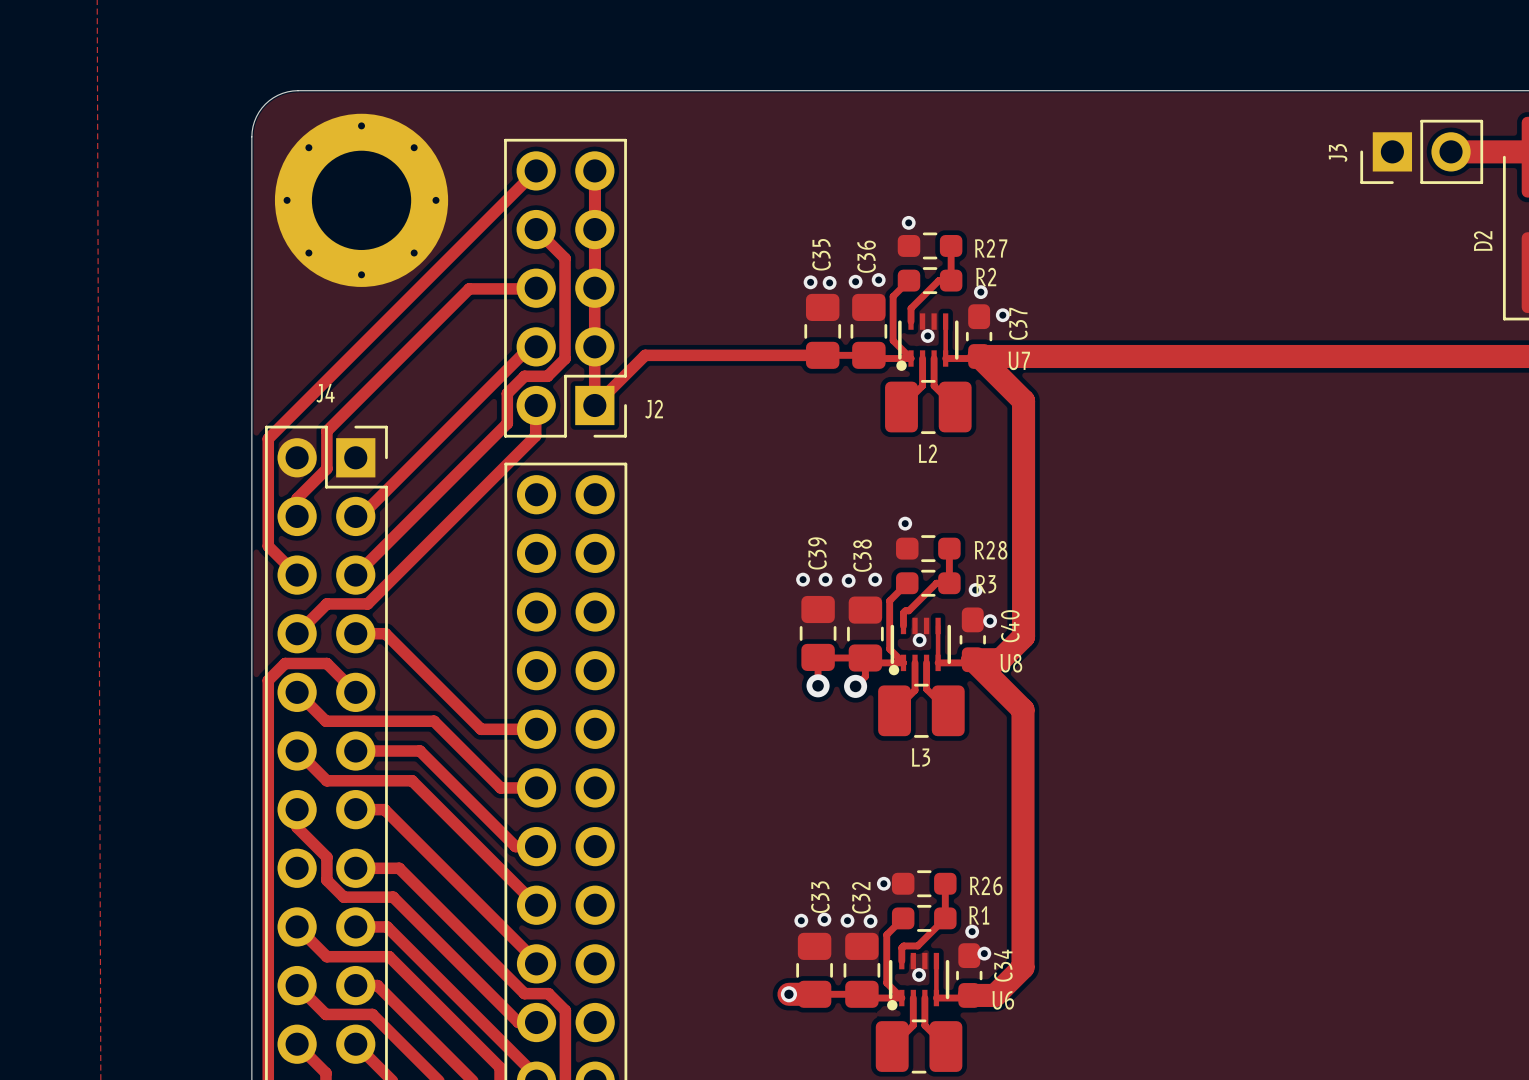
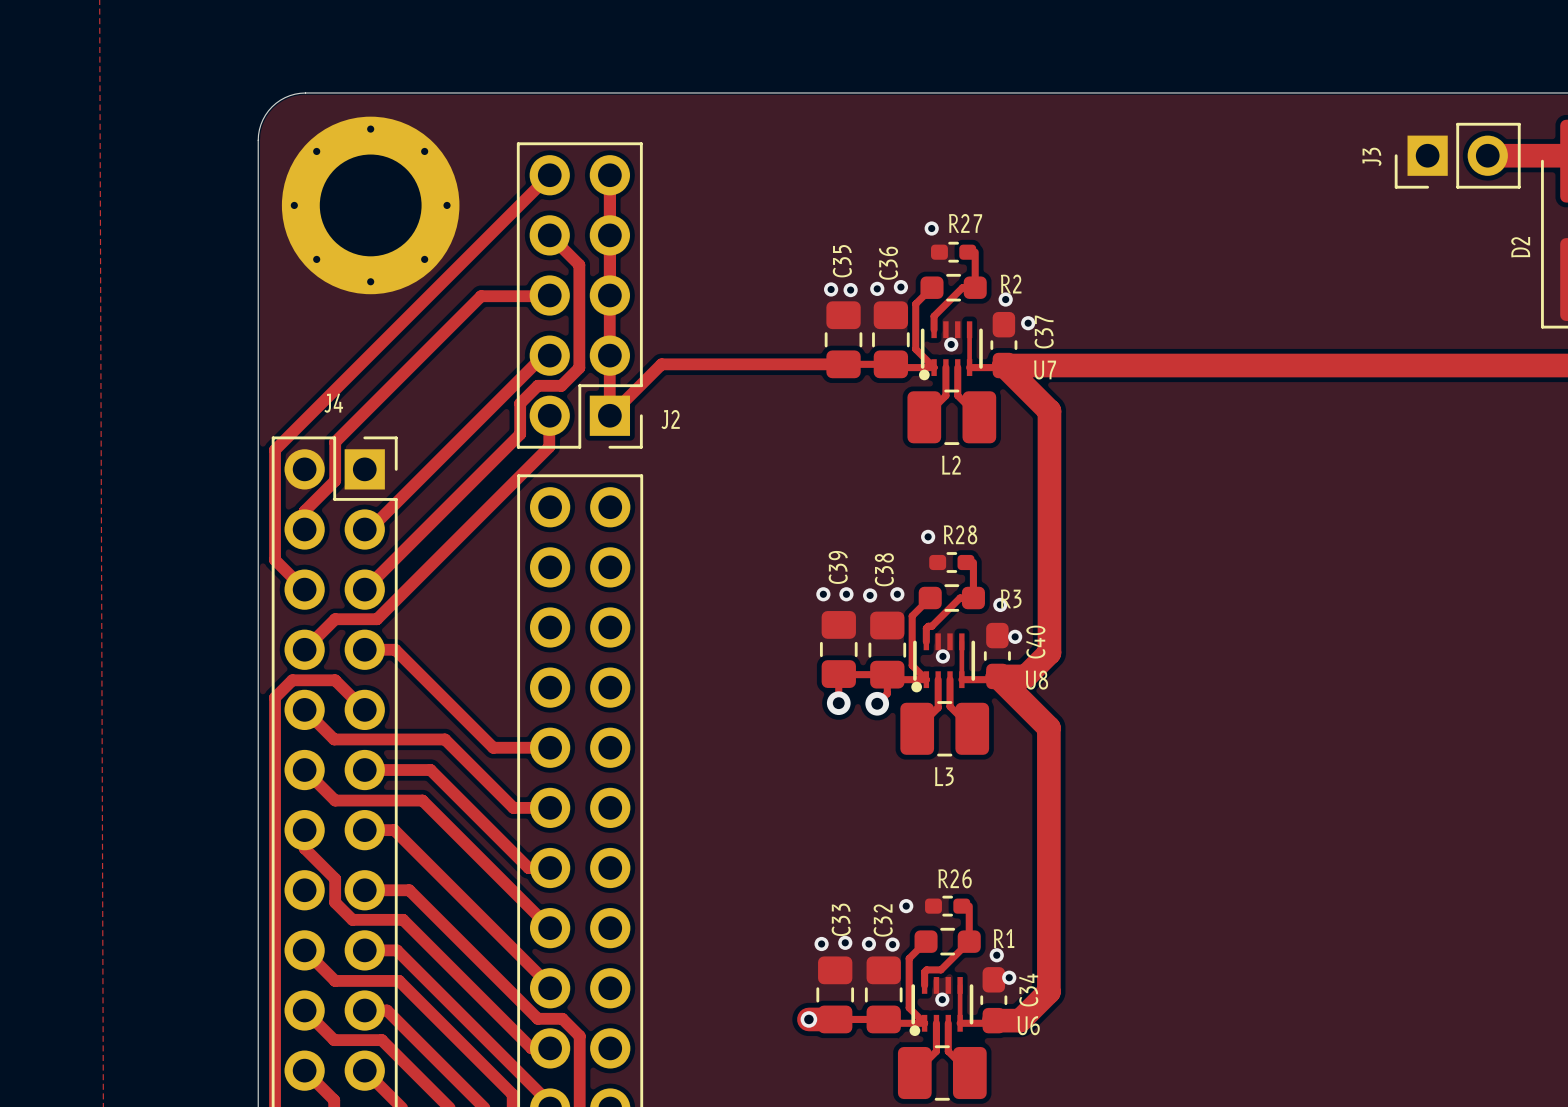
R27 footprint: [897, 232, 963, 260] -> [931, 241, 977, 263]
R27 name position: R27 (991, 248) -> R27 (965, 223)
R28 footprint: [896, 535, 961, 563] -> [929, 552, 975, 573]
R28 name position: R28 (991, 550) -> R28 (960, 534)
R26 footprint: [891, 870, 957, 898] -> [925, 895, 971, 917]
R26 name position: R26 (986, 885) -> R26 (955, 878)

